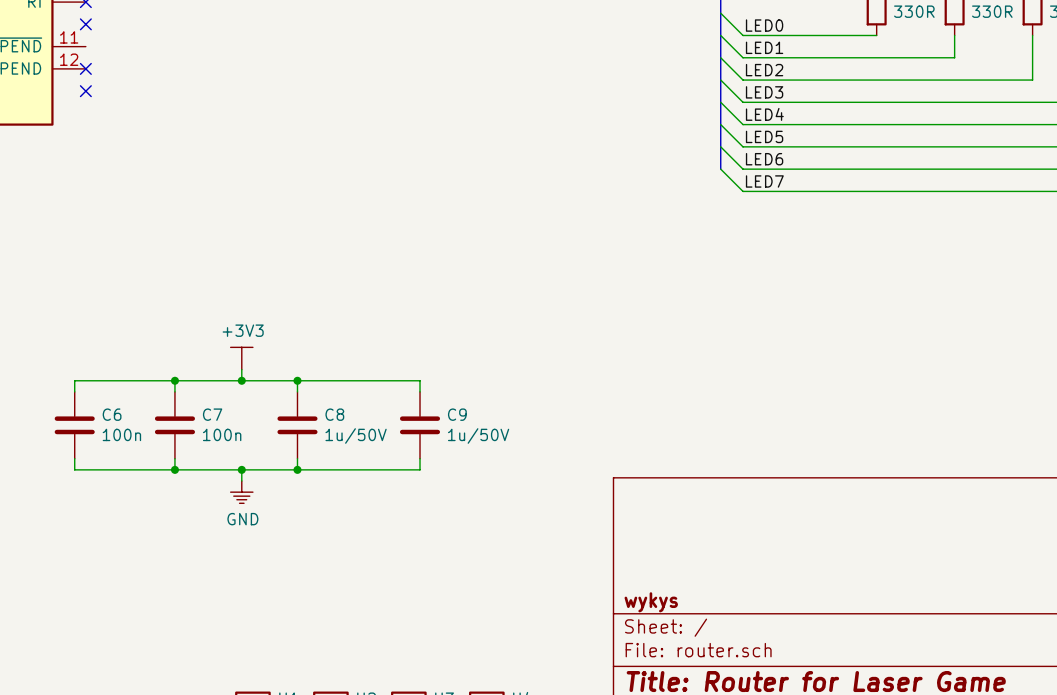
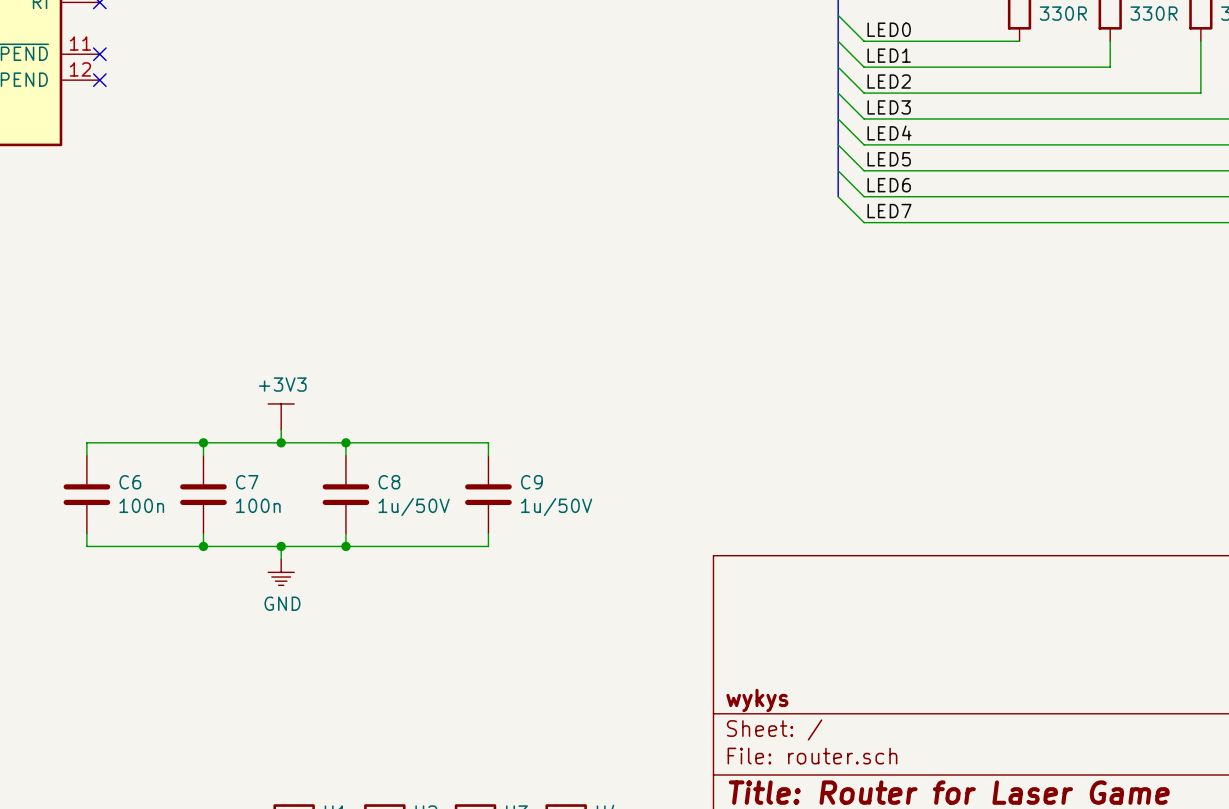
no-connect mark: (85, 24) -> none
no-connect mark: none -> (99, 54)
no-connect mark: (85, 91) -> none

